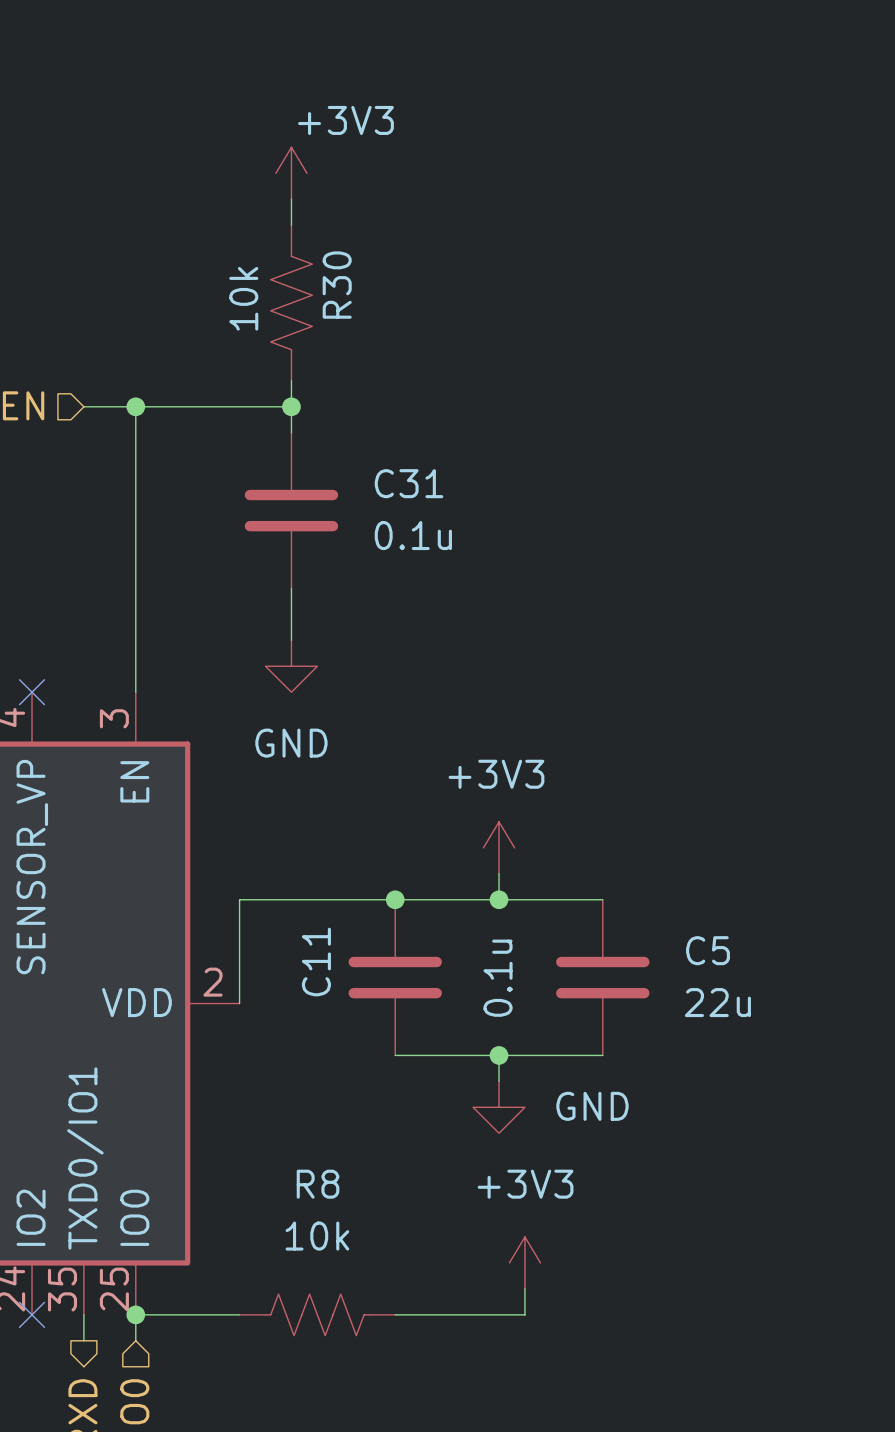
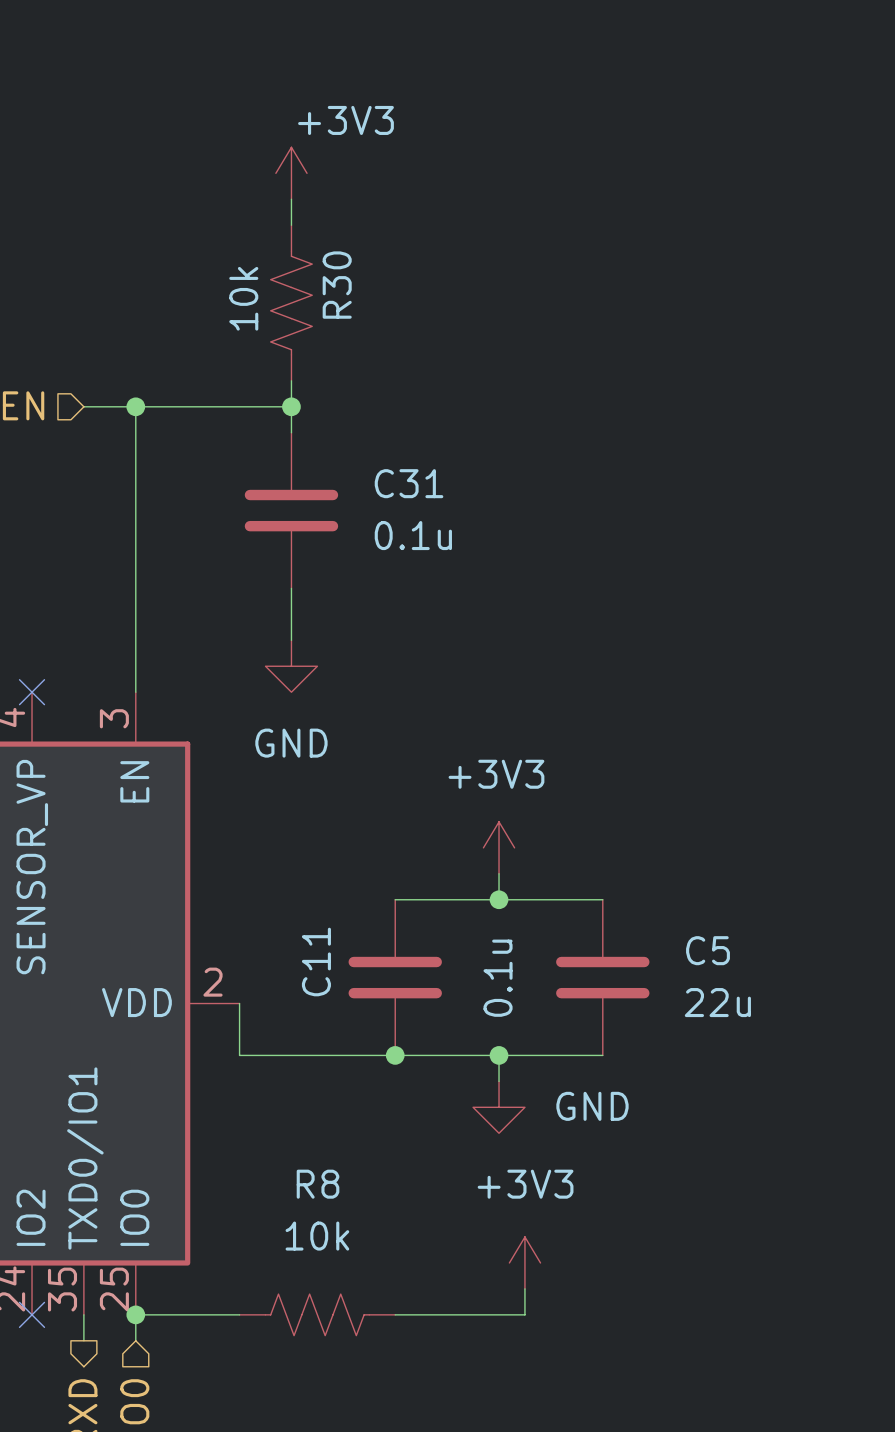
wire: (395, 899) (239, 899) (239, 1003) -> (395, 1055) (239, 1055) (239, 1003)
junction: (395, 899) -> none
junction: none -> (395, 1055)

